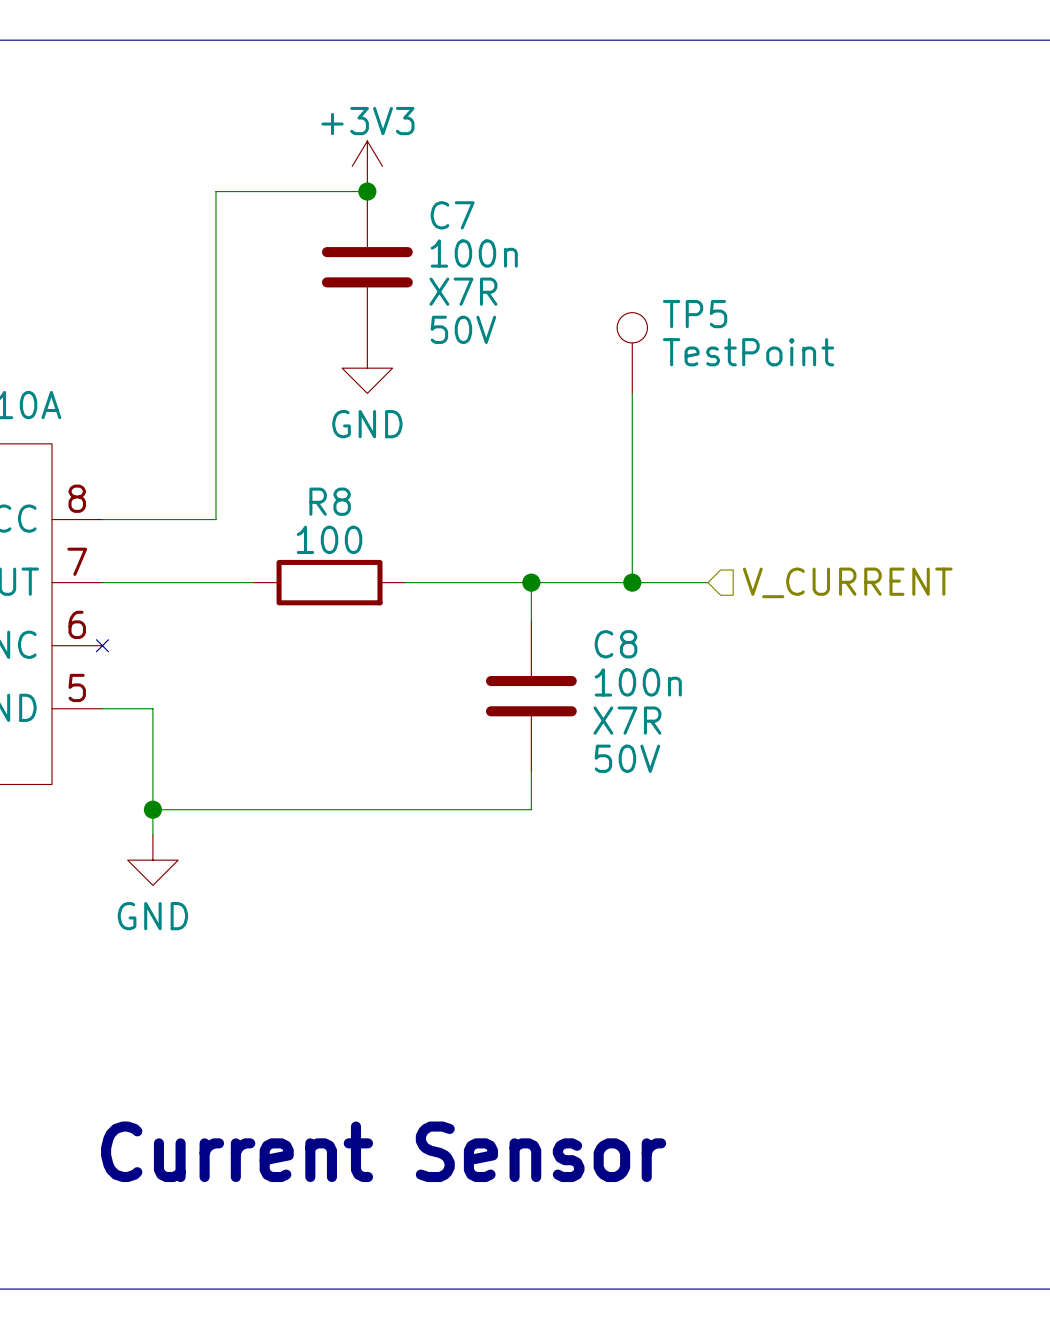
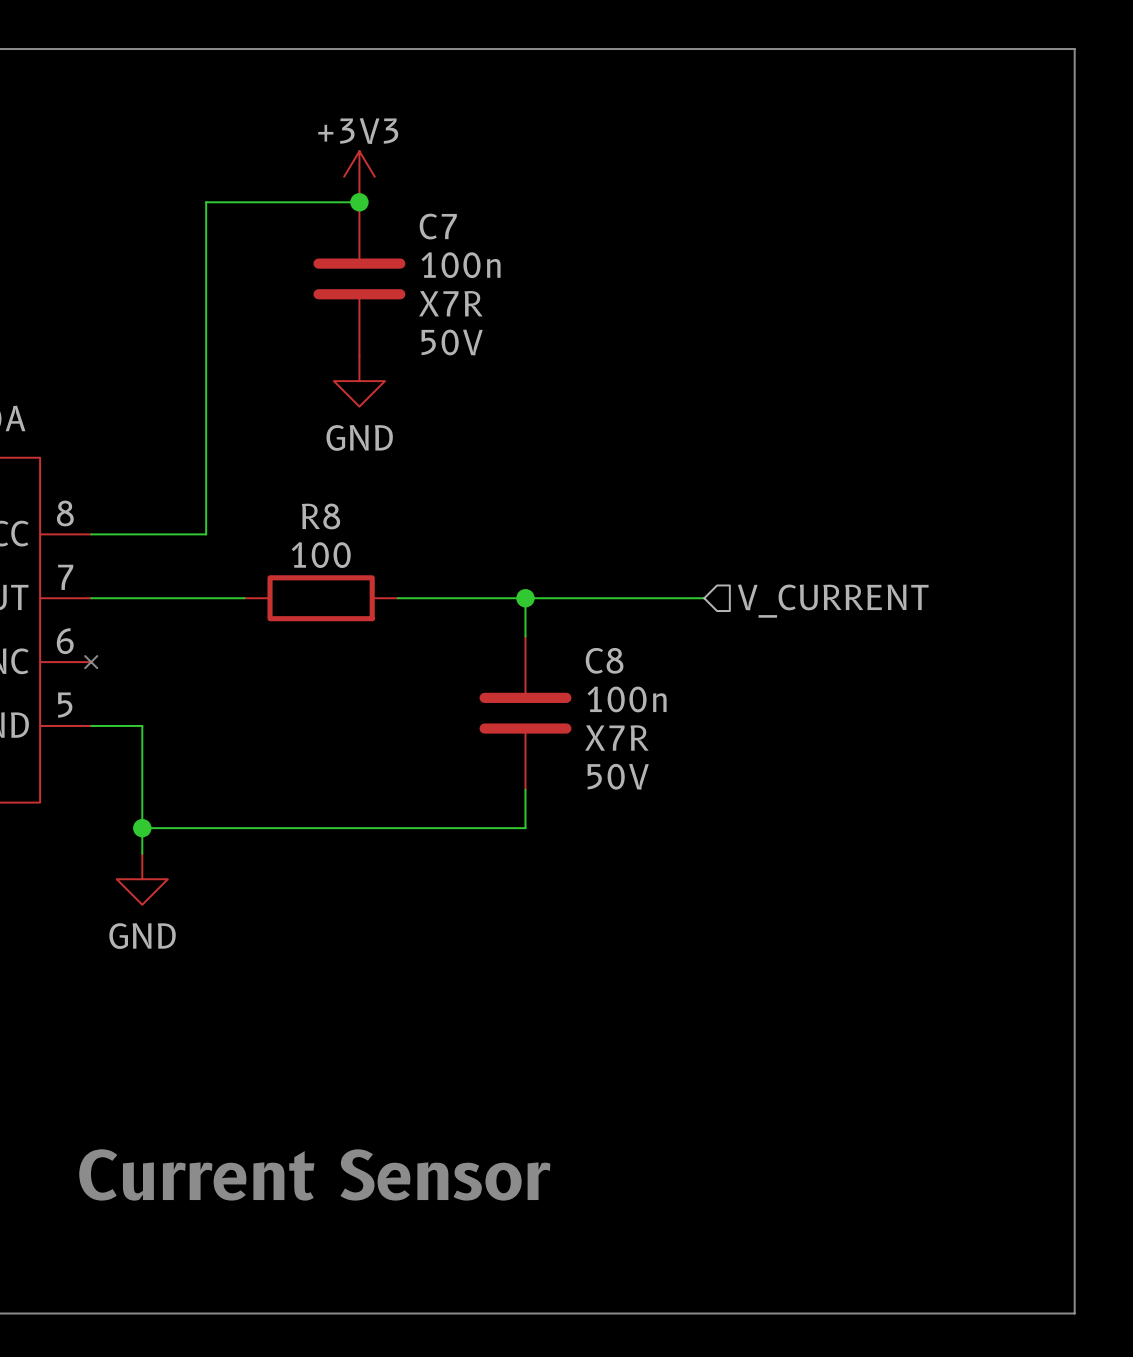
TP5: TestPoint (632, 353) -> none
wire: (632, 393) (632, 582) -> none
junction: (632, 582) -> none

